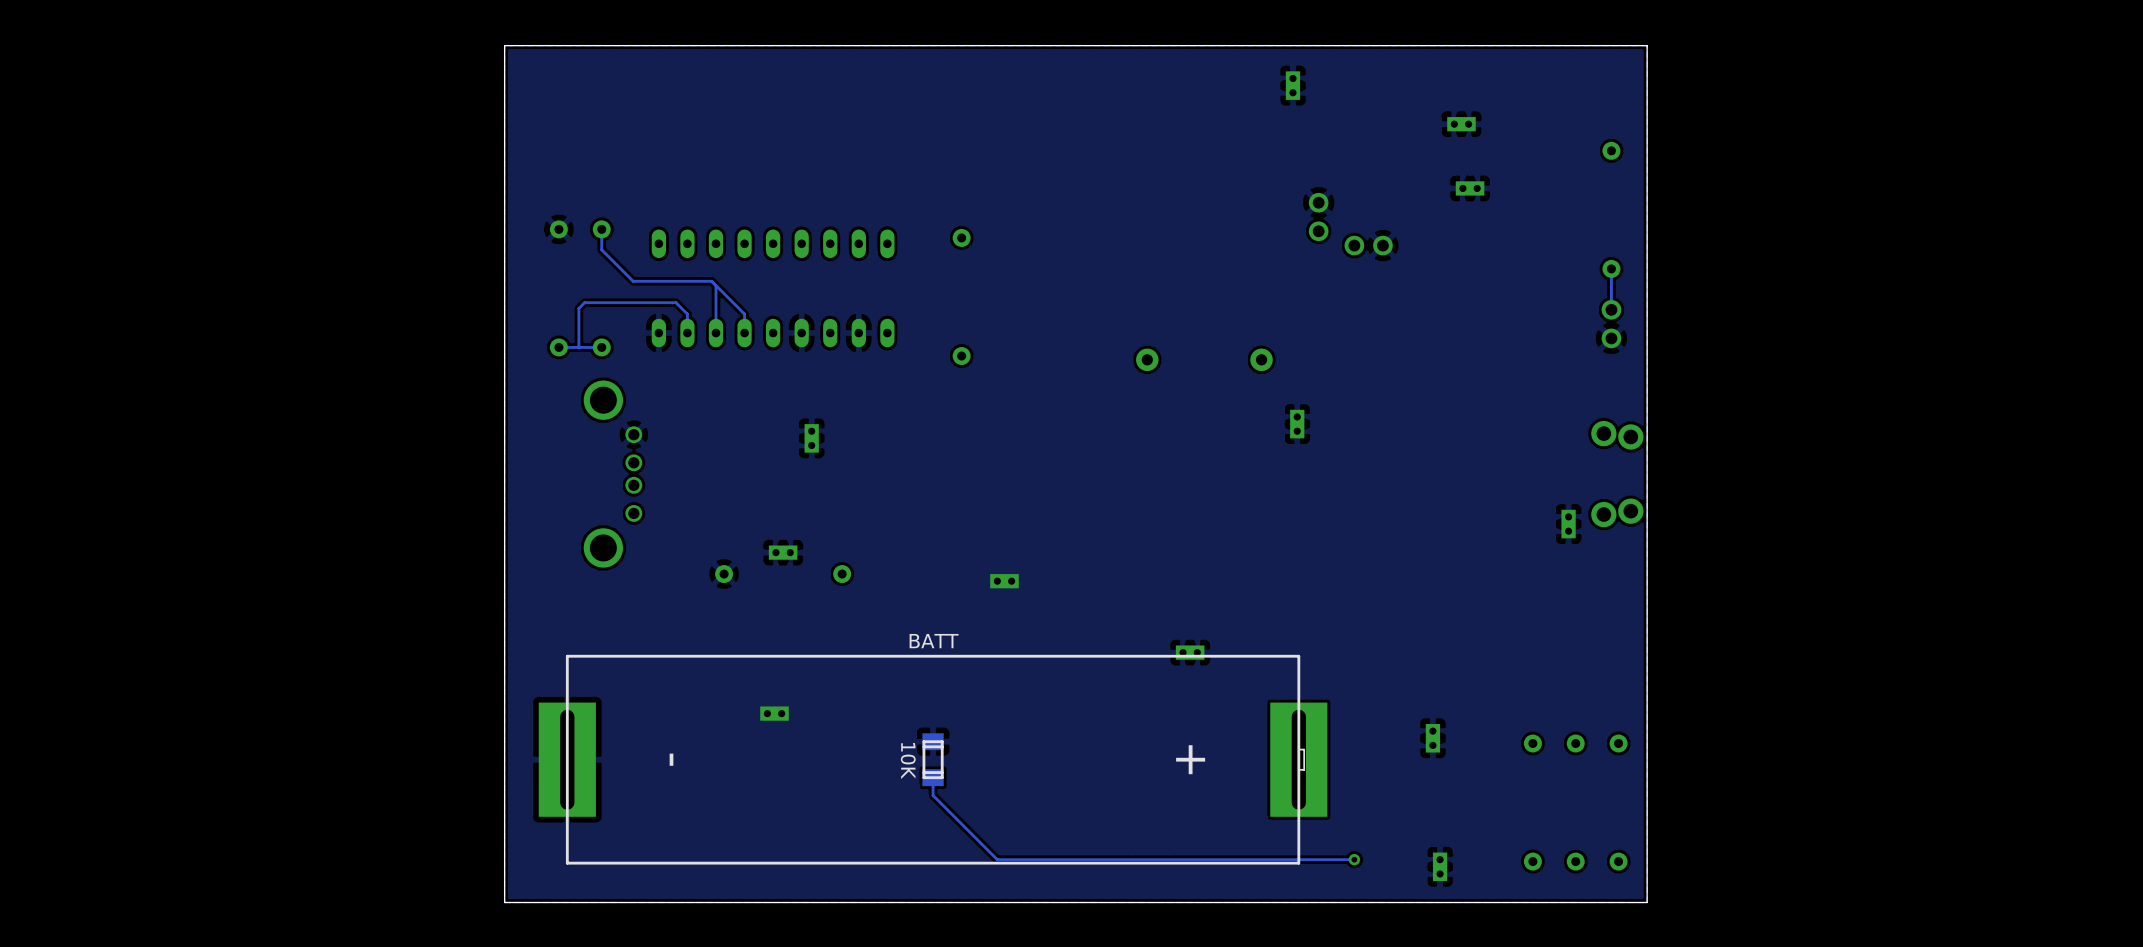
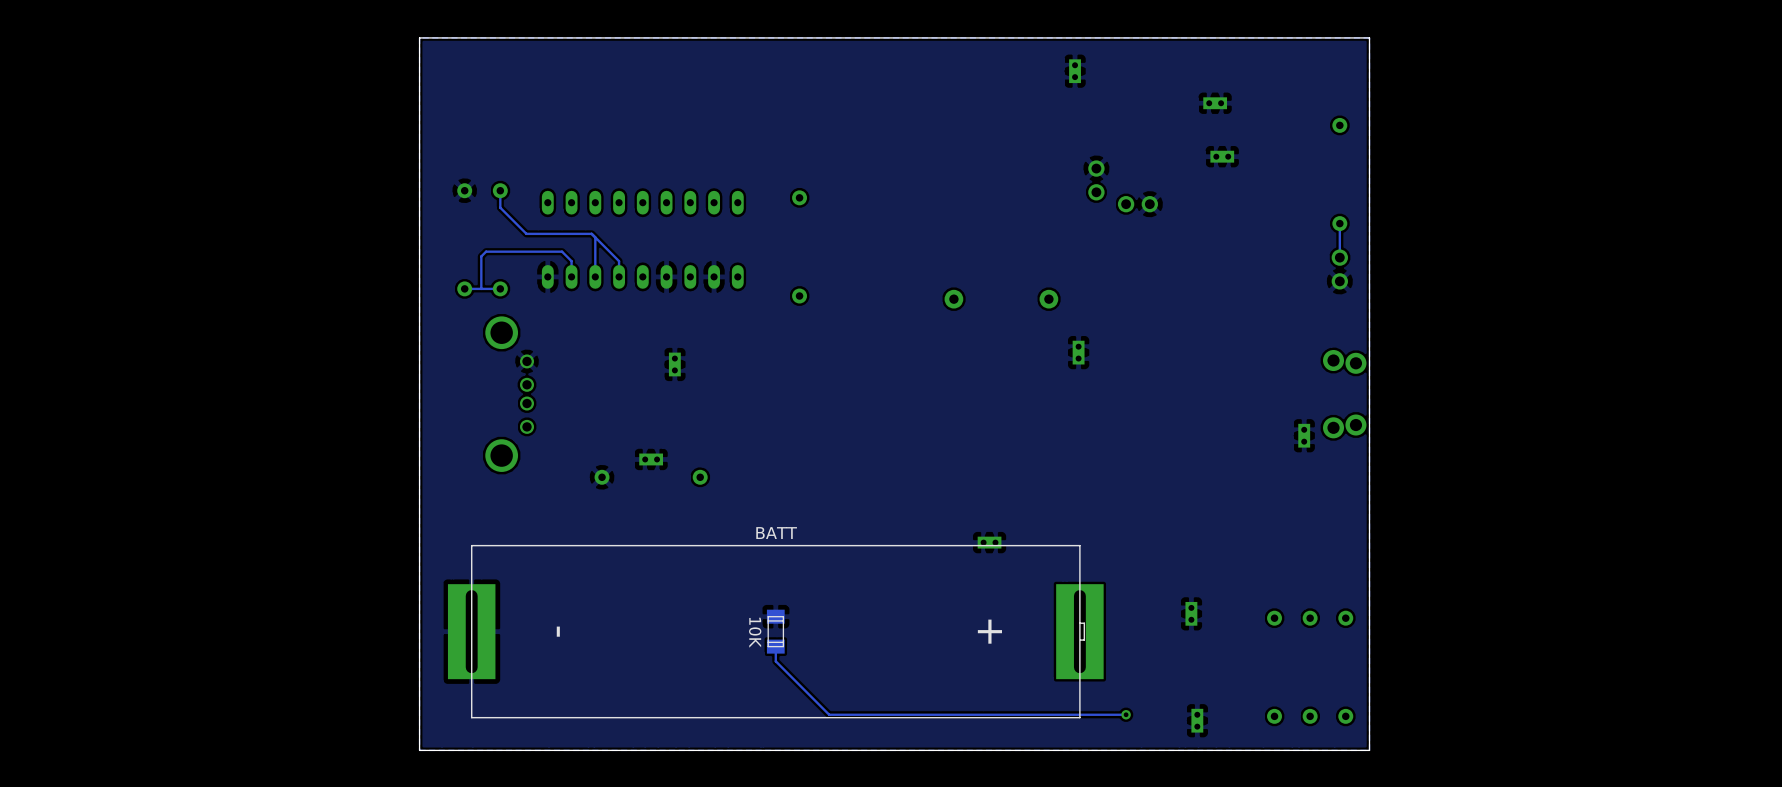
part: (1004, 581) -> none
part: (774, 713) -> none
part: BATT (933, 759) -> none
part: 10K (933, 759) -> none
part: none -> 10K (775, 631)
part: none -> BATT (775, 631)

